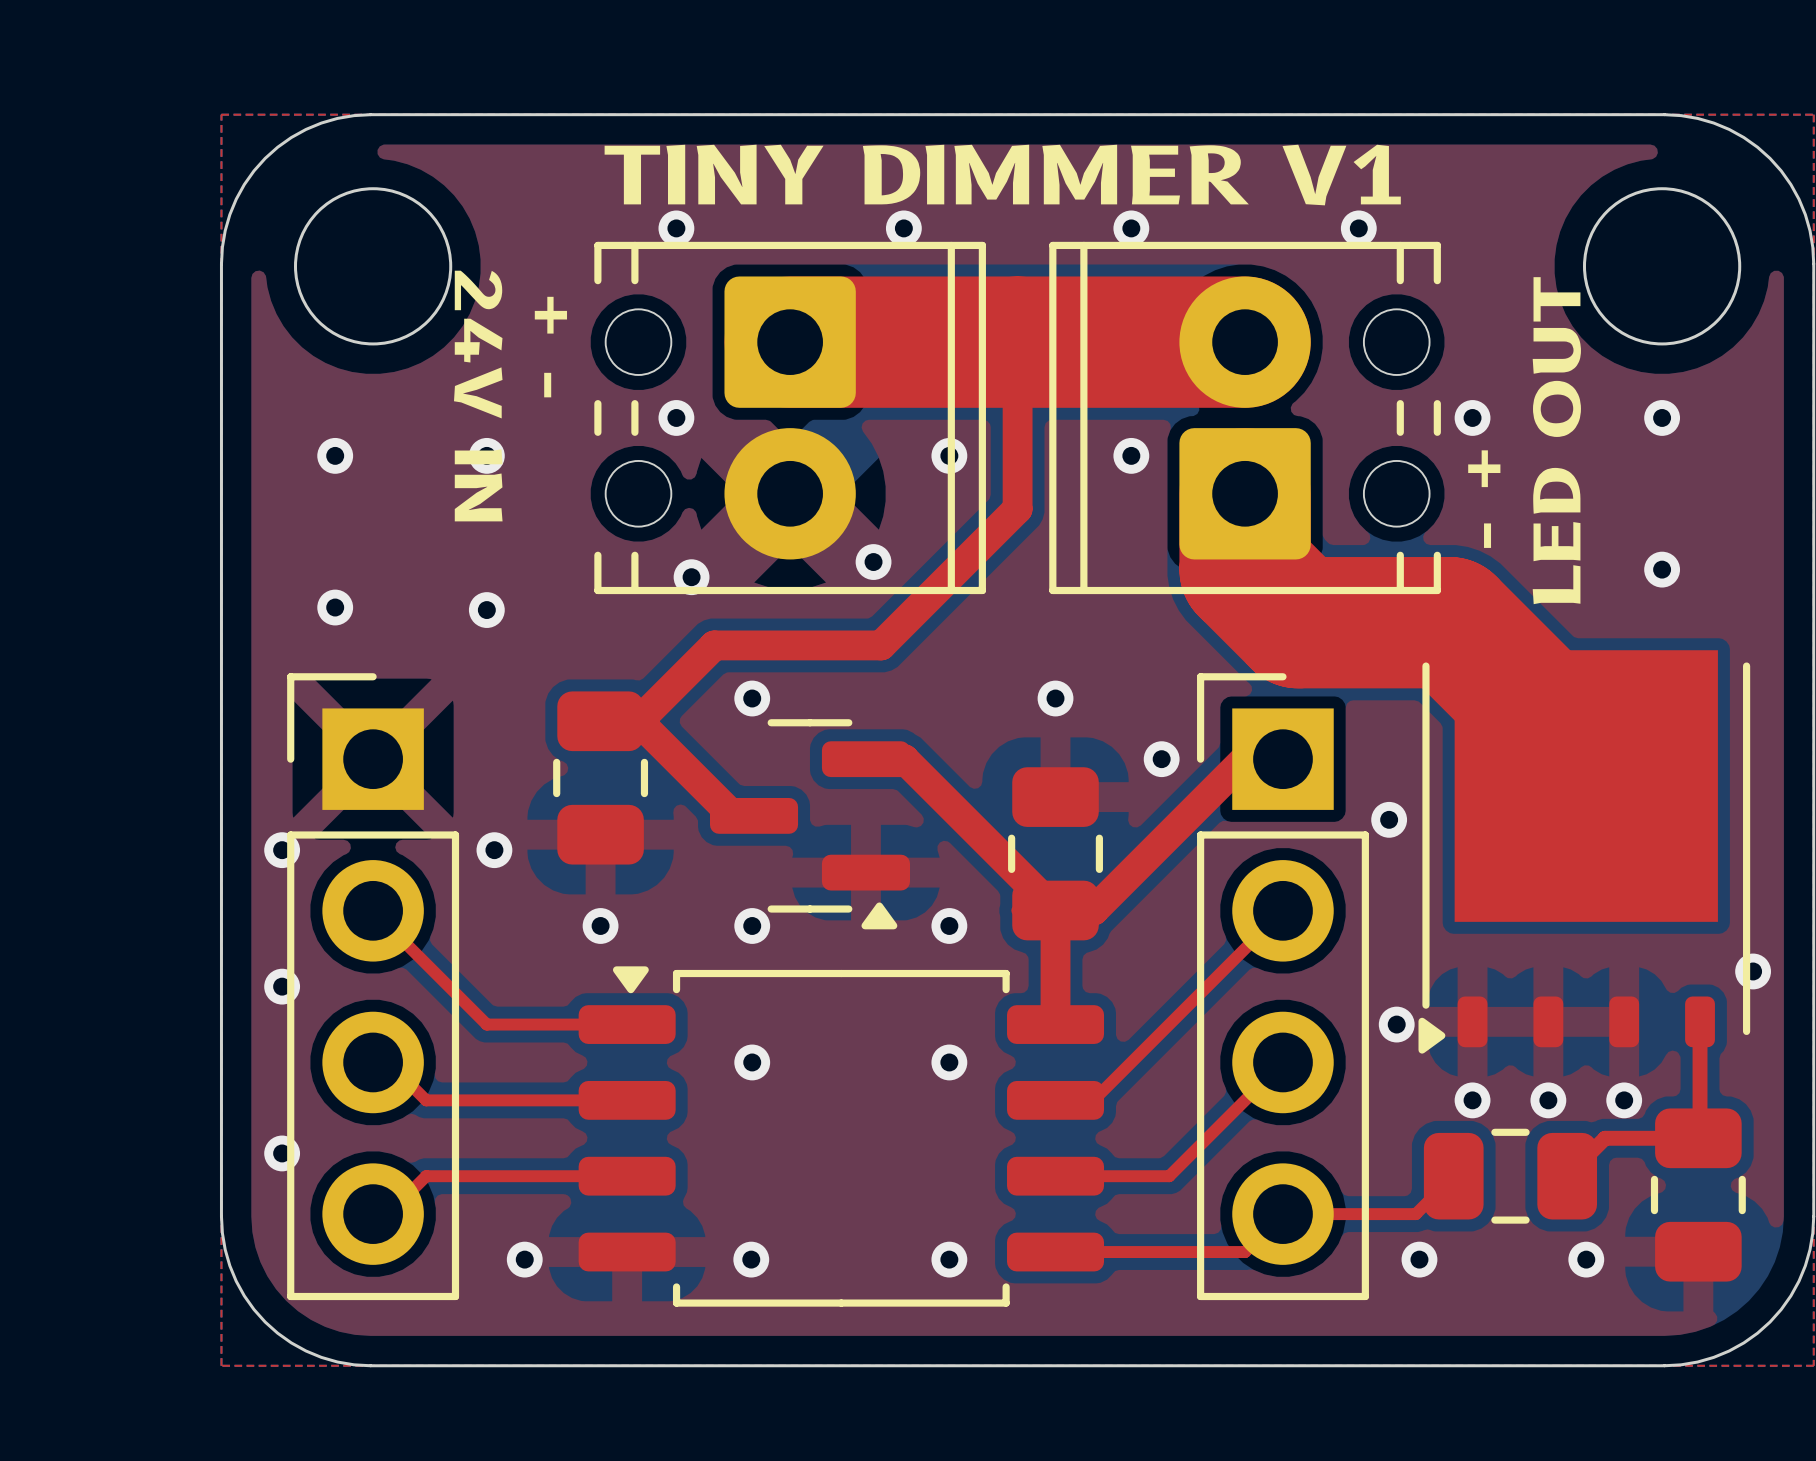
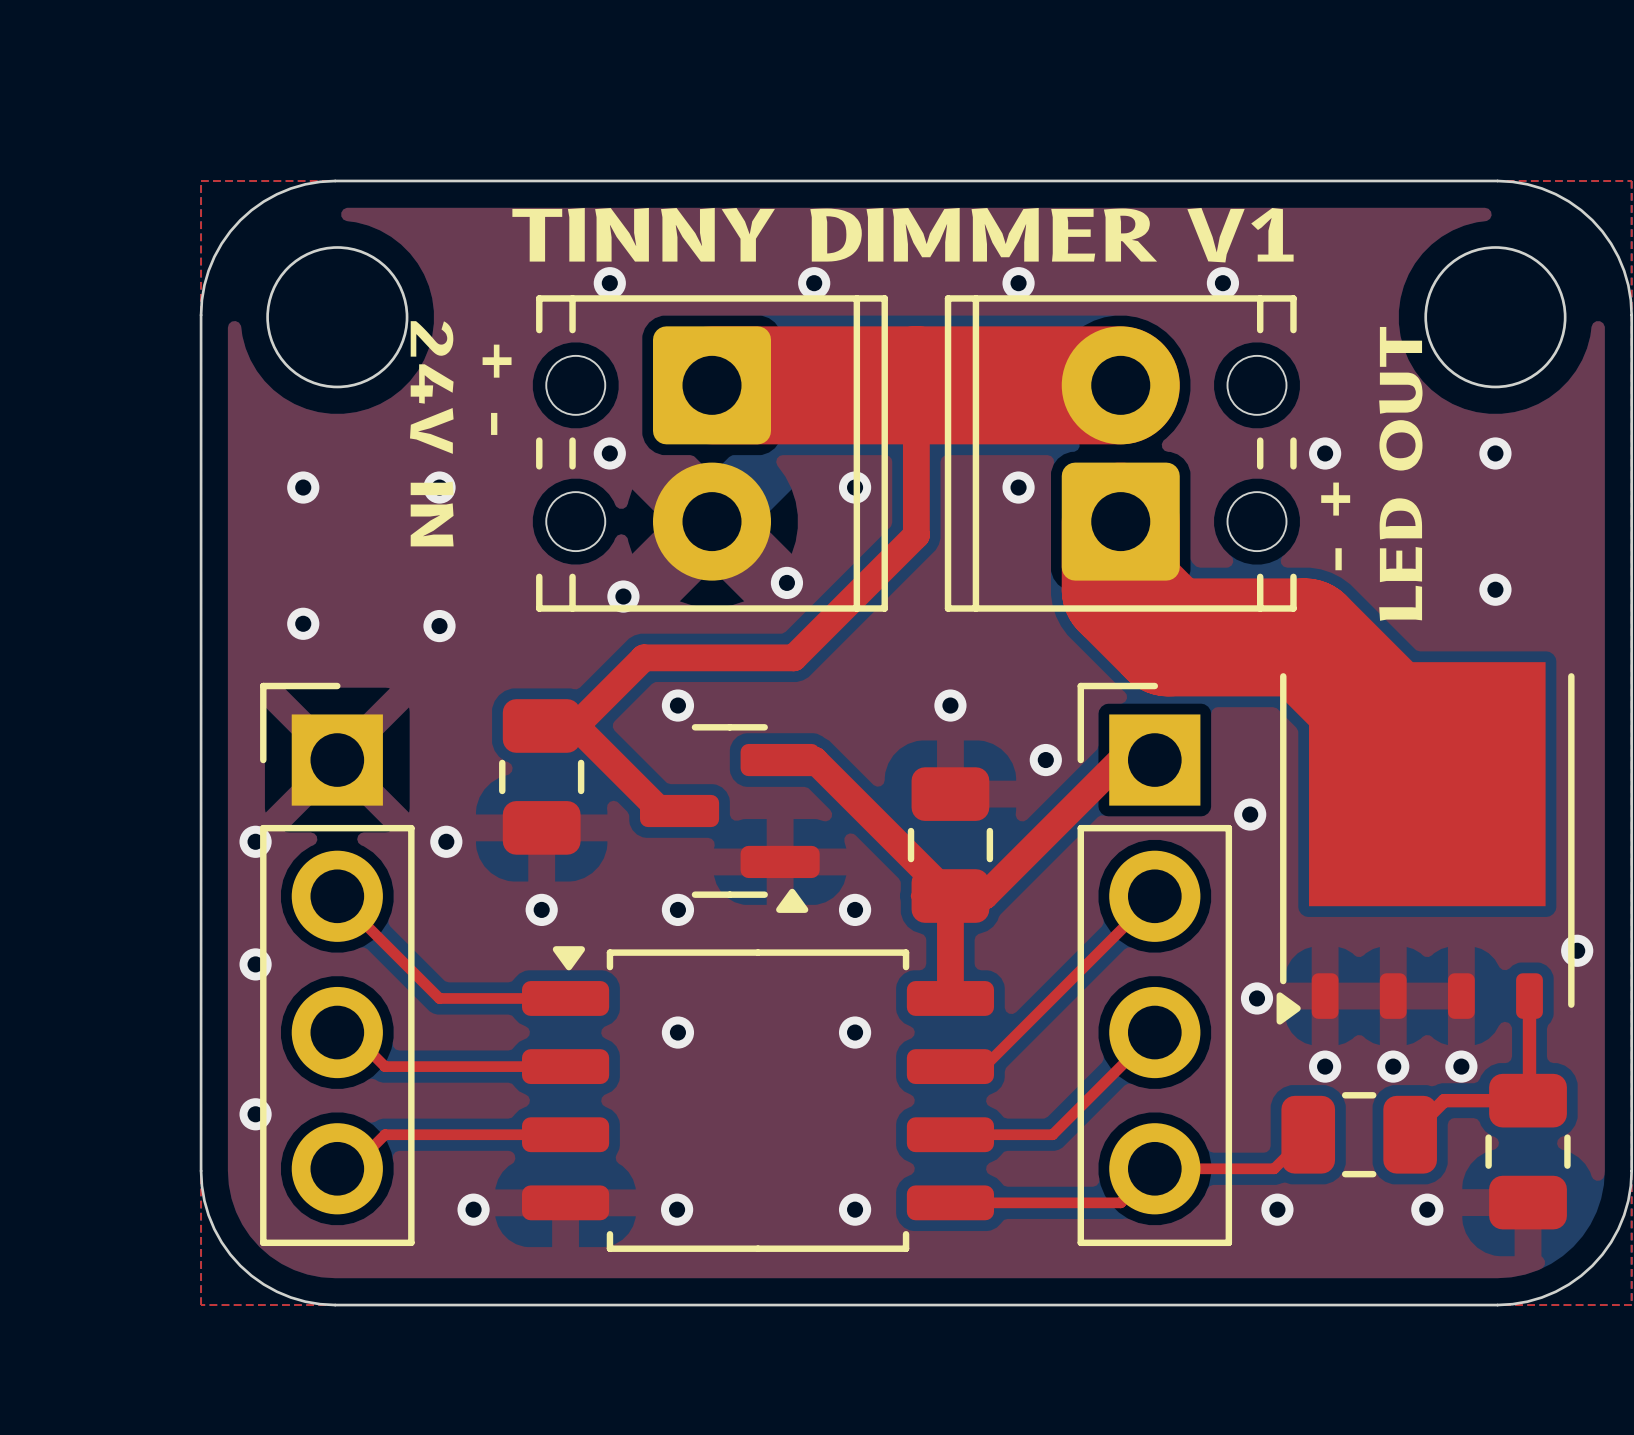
text: TINY DIMMER V1 (1002, 175) -> TINNY DIMMER V1 (902, 235)

